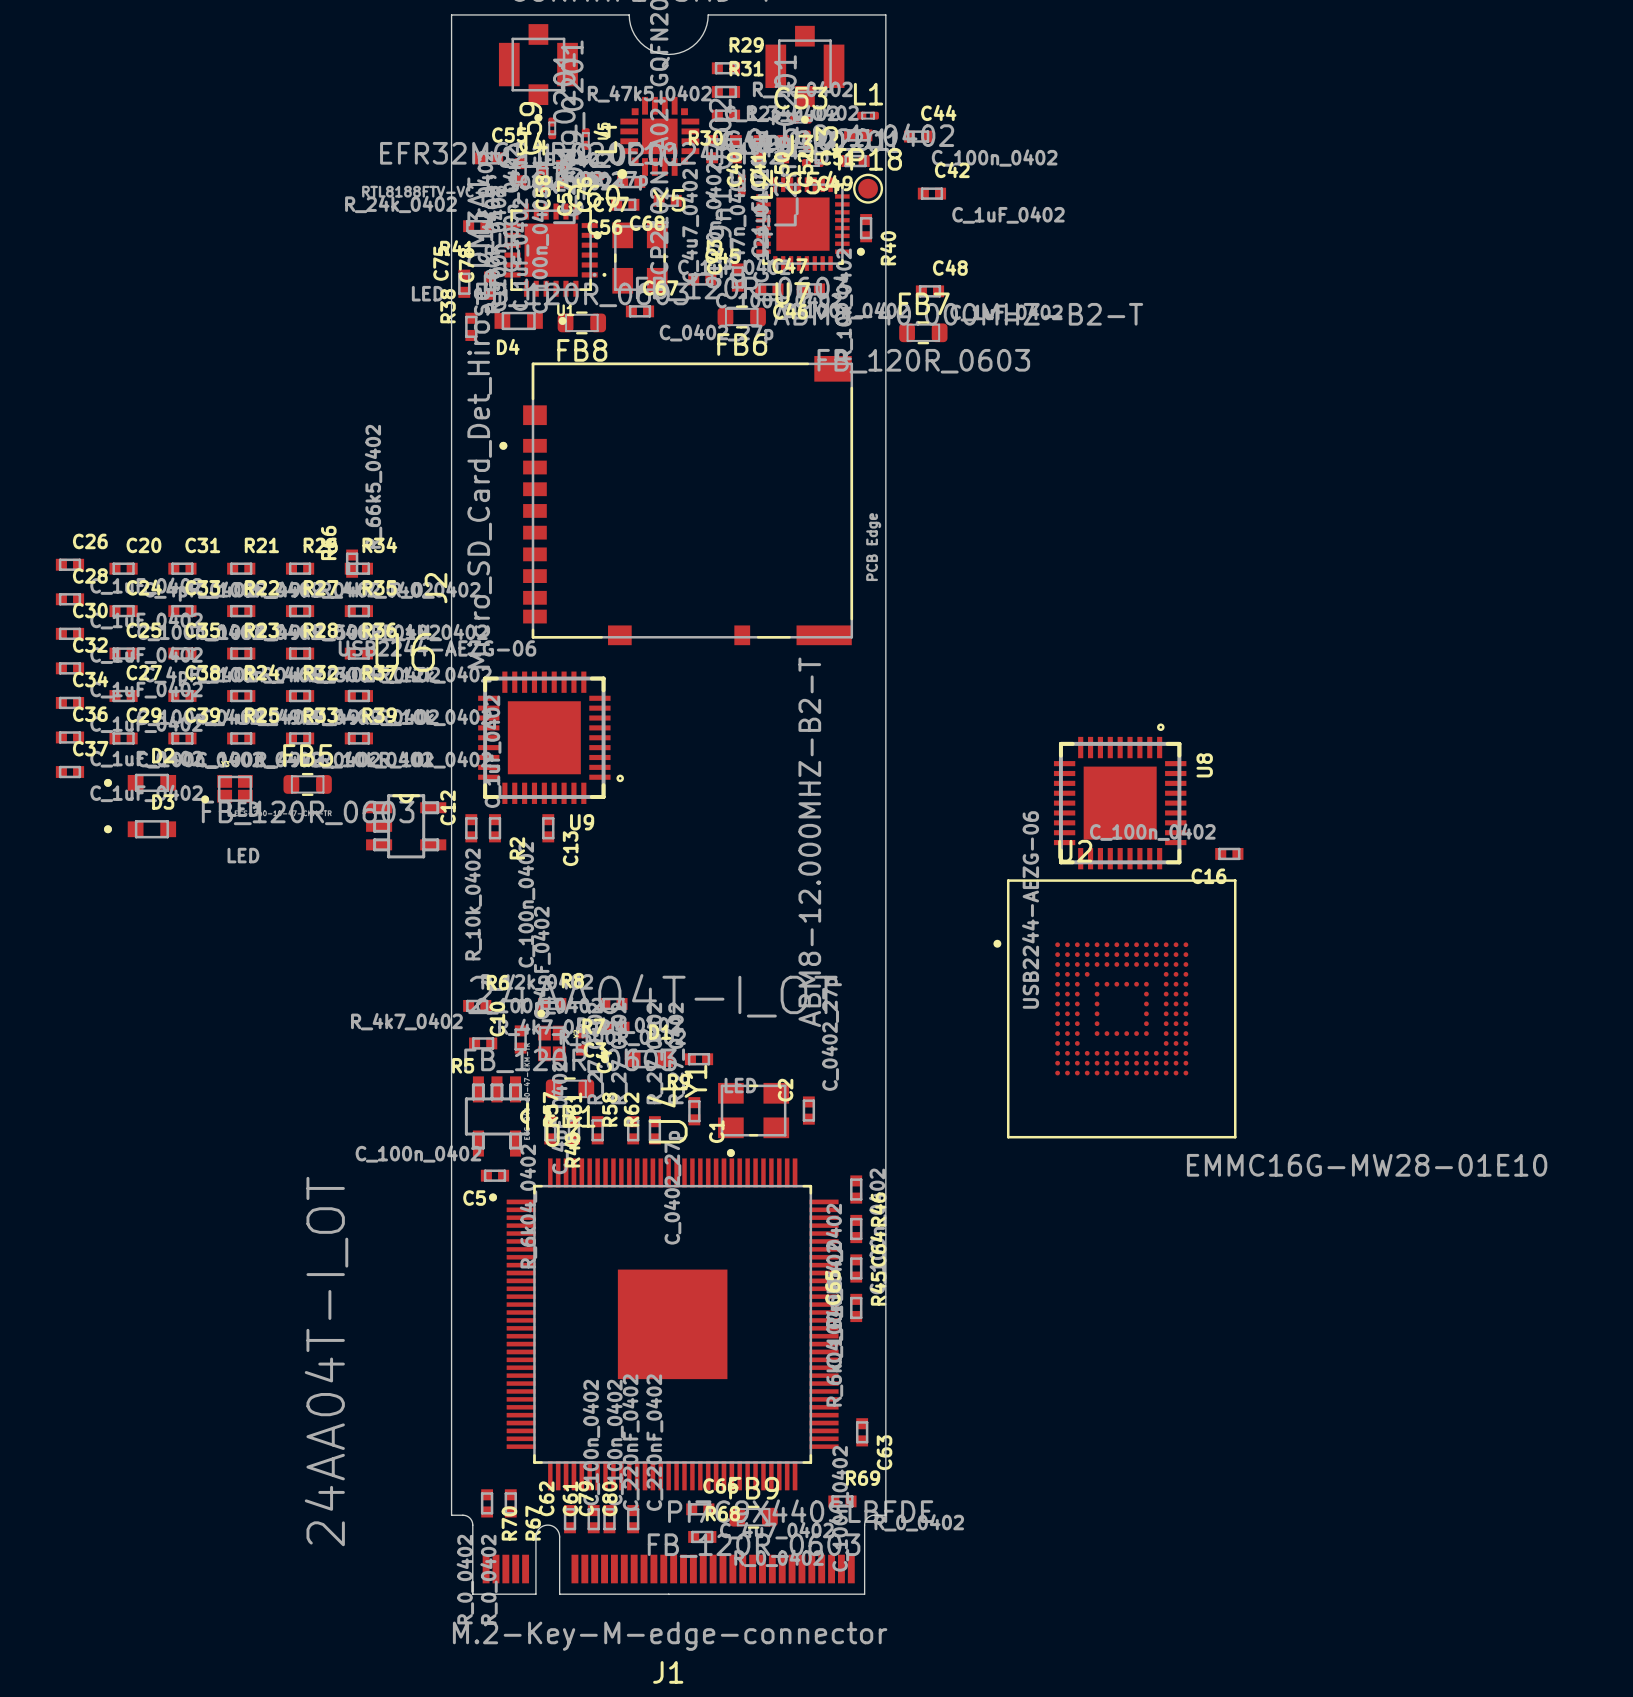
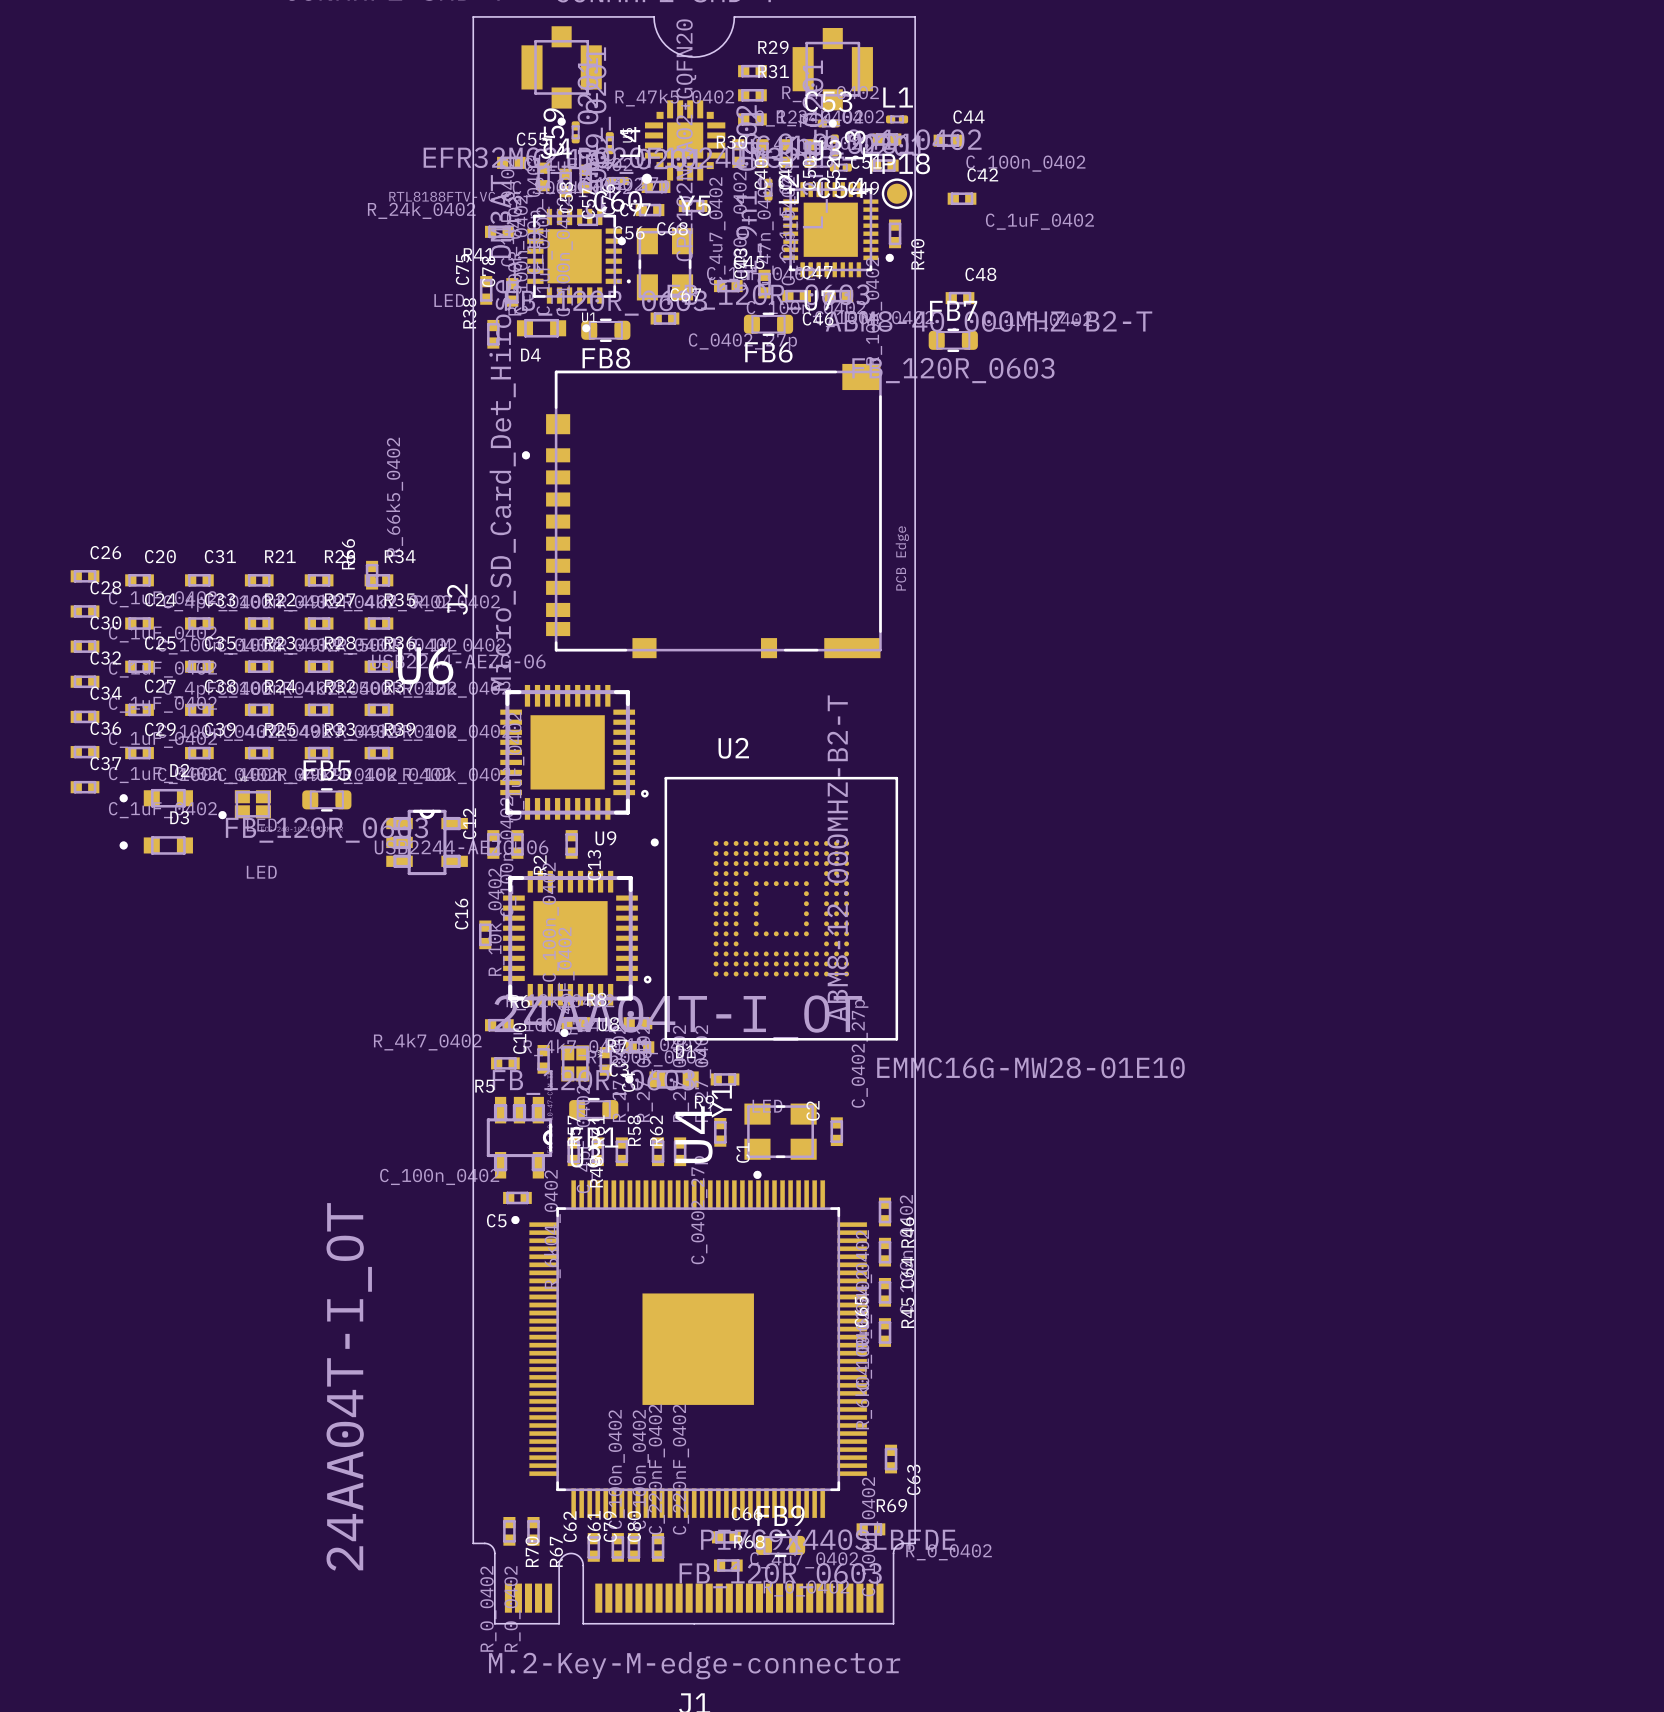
U8 rotation: 0° (1120, 796) -> 90° clockwise (577, 938)
U8 position: (1120, 796) -> (577, 938)
C16 rotation: 0° (1229, 853) -> 90° clockwise (485, 934)
C16 position: (1229, 853) -> (485, 934)
U2 position: (1114, 1008) -> (774, 908)

